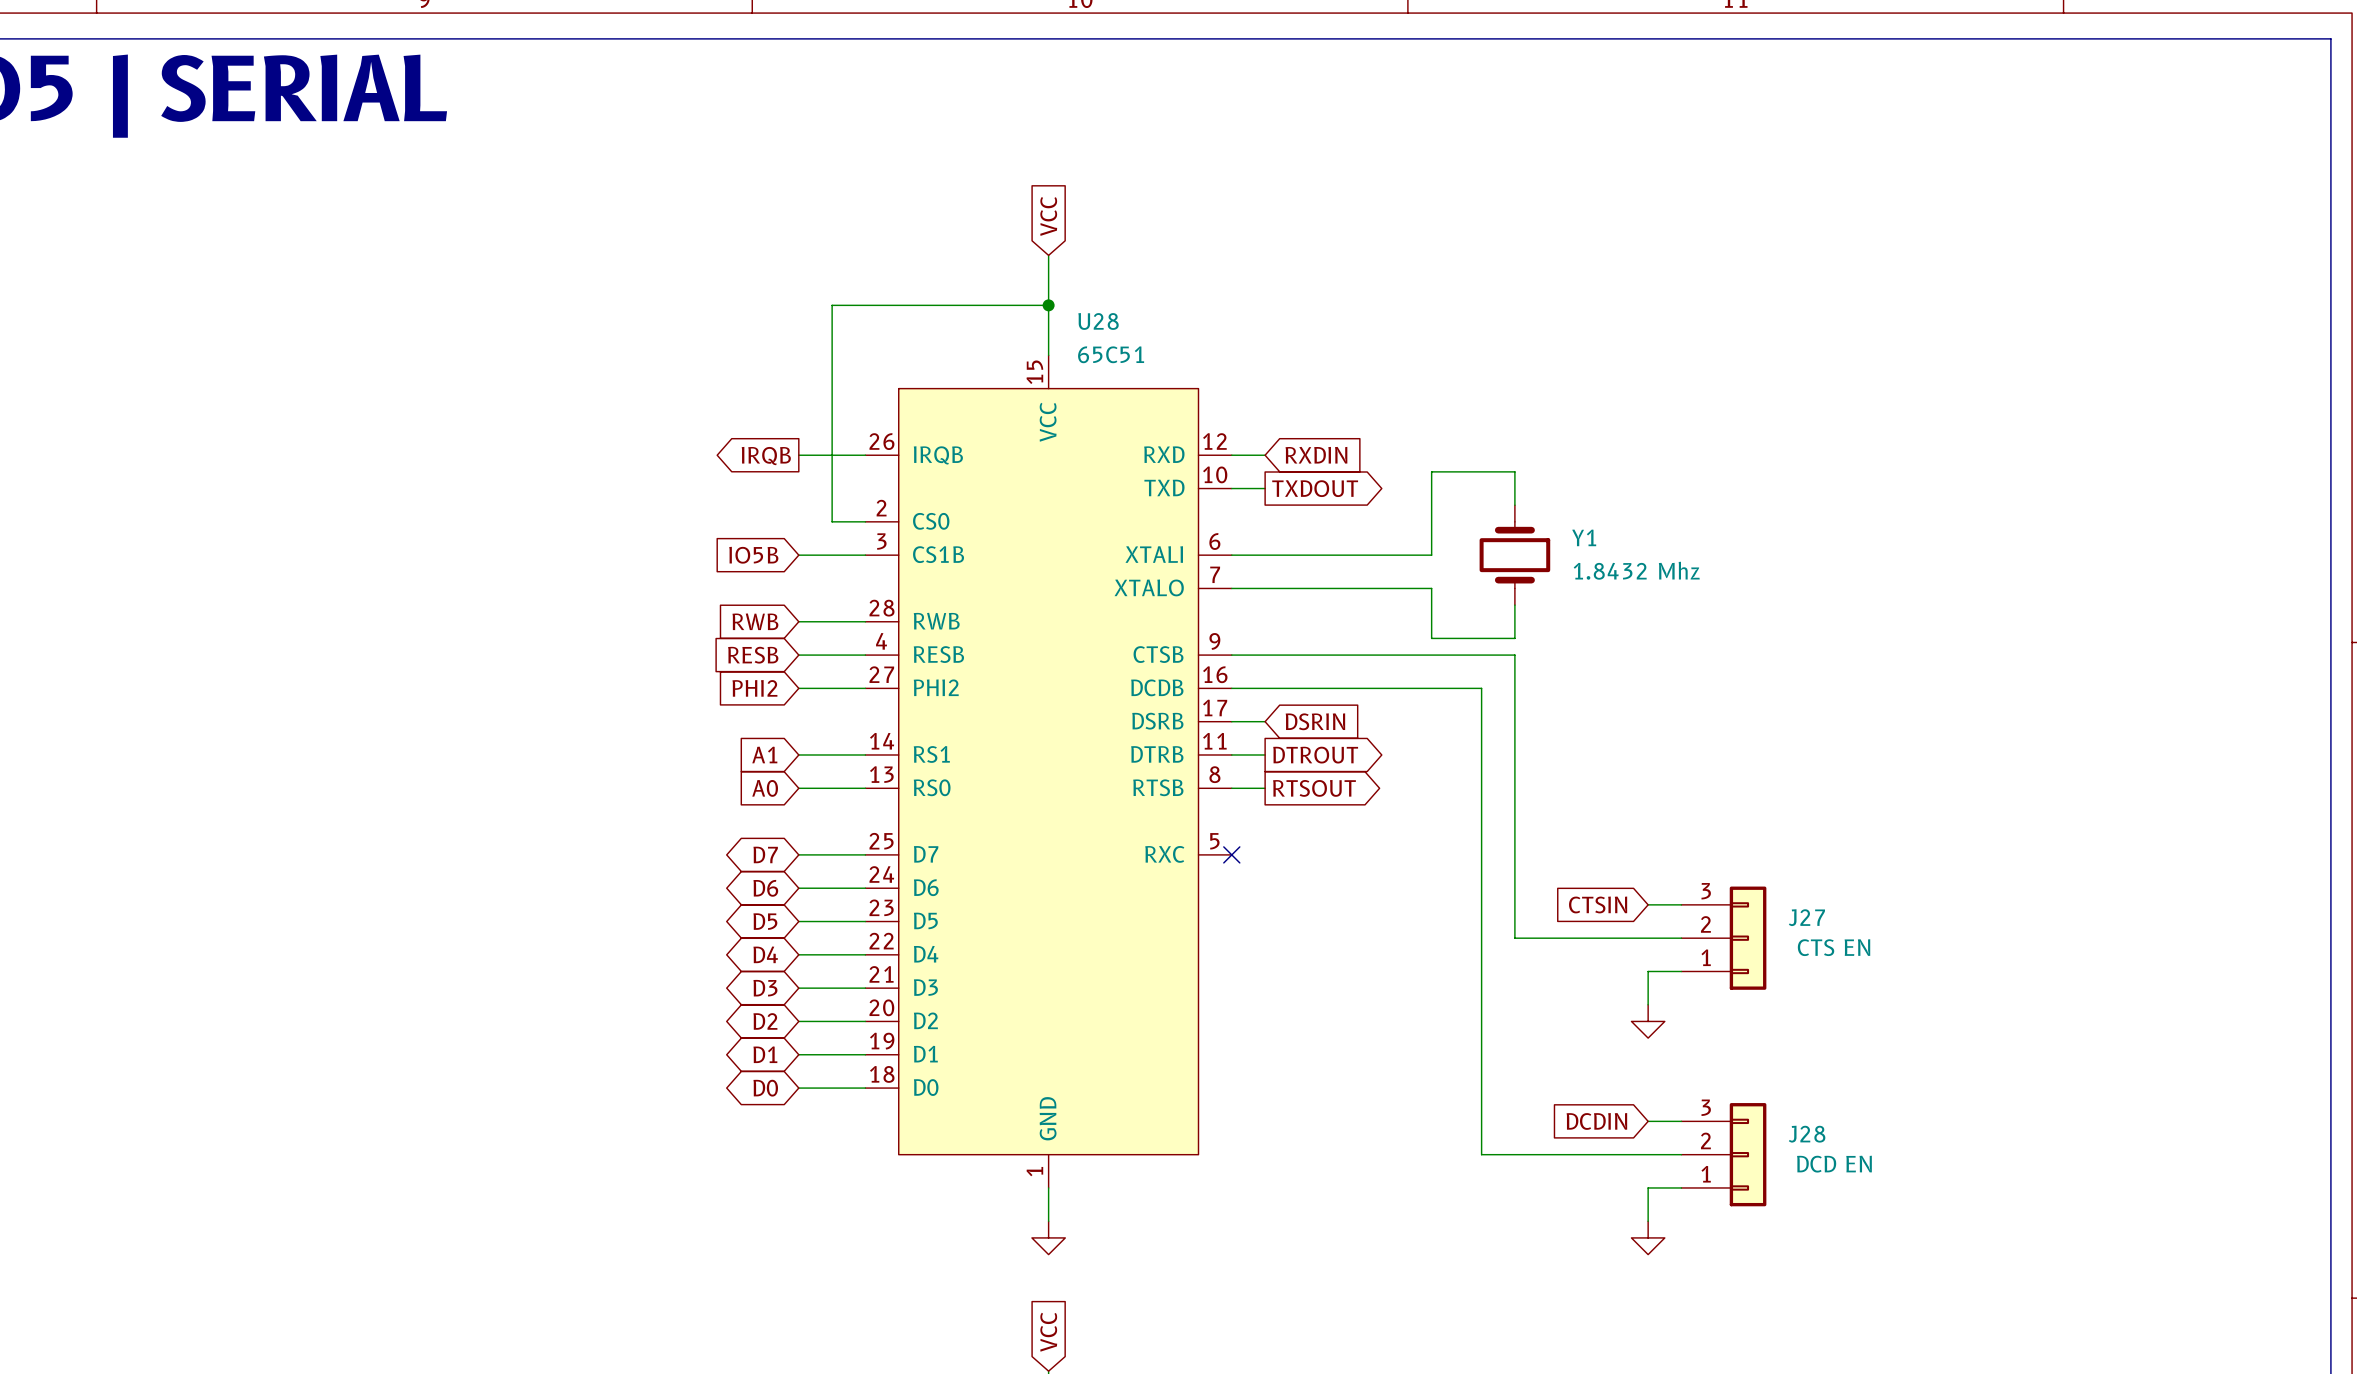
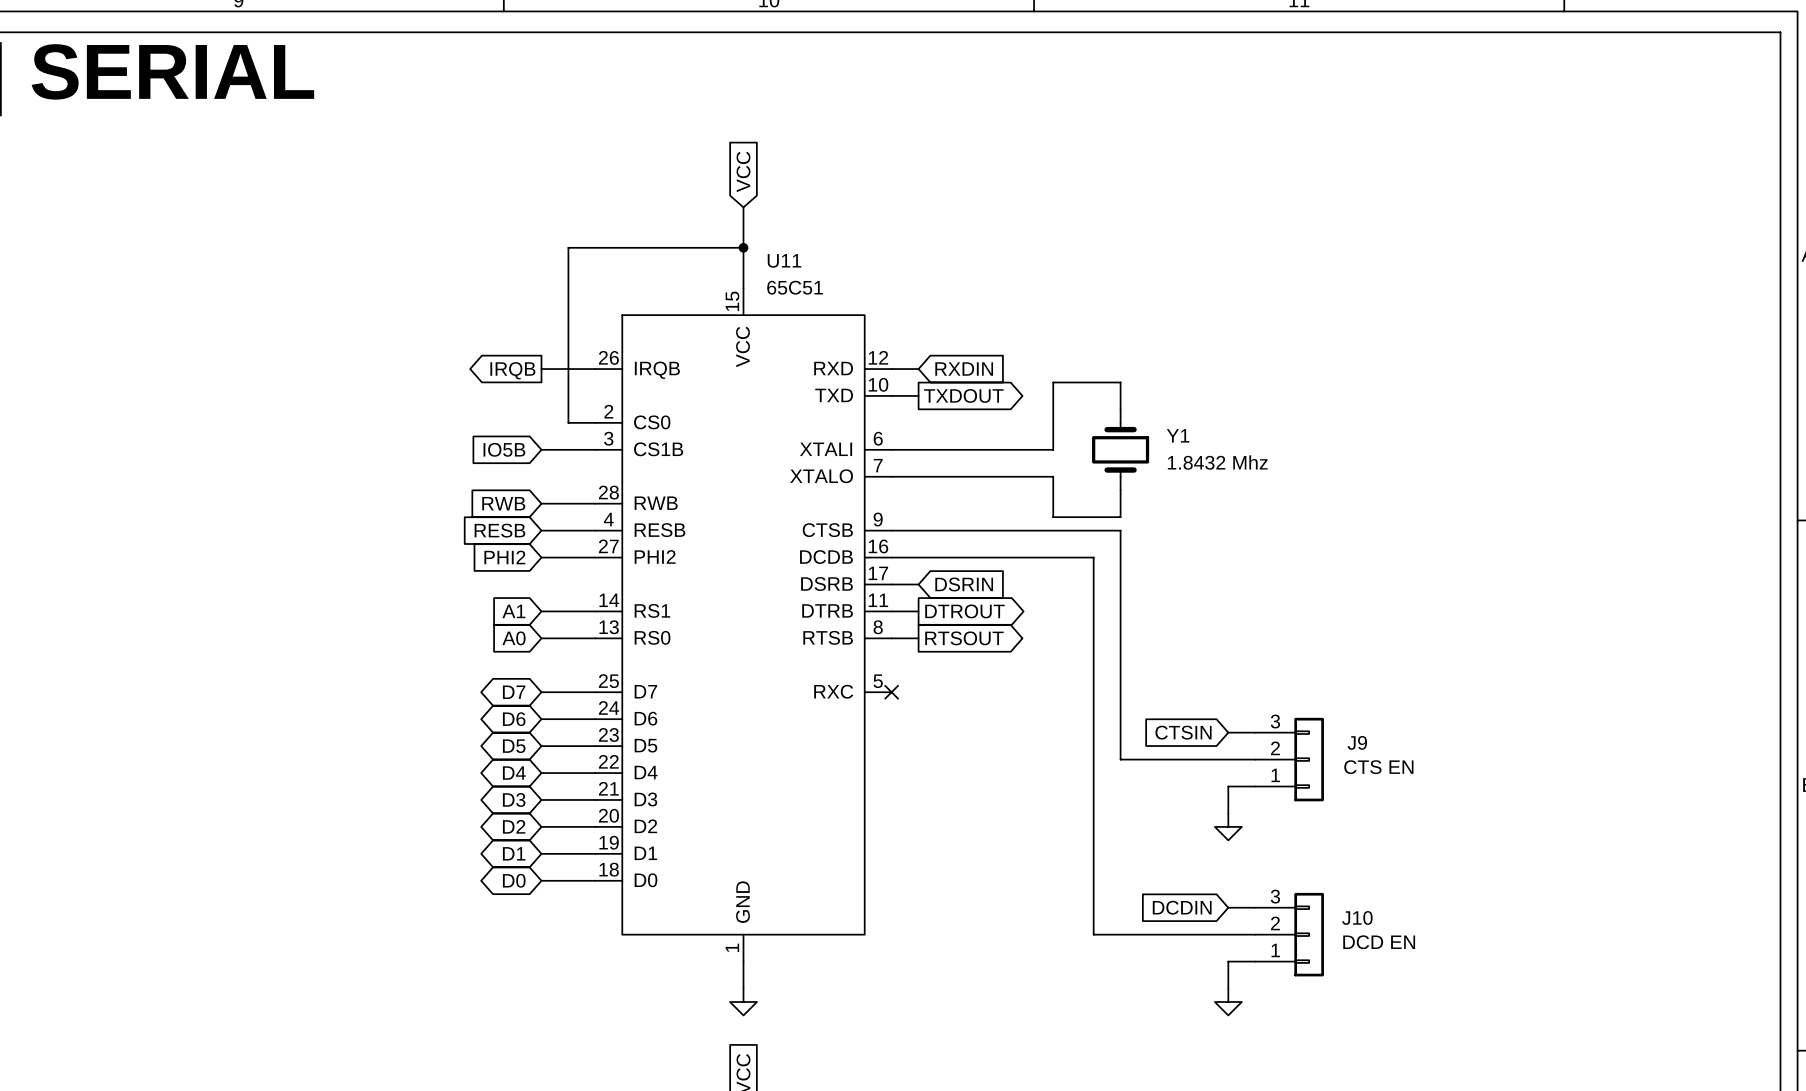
U28 name: U28 (1098, 321) -> U11 (784, 260)
J27 name: J27 (1806, 917) -> J9 (1357, 742)
J28 name: J28 (1807, 1134) -> J10 (1357, 917)

